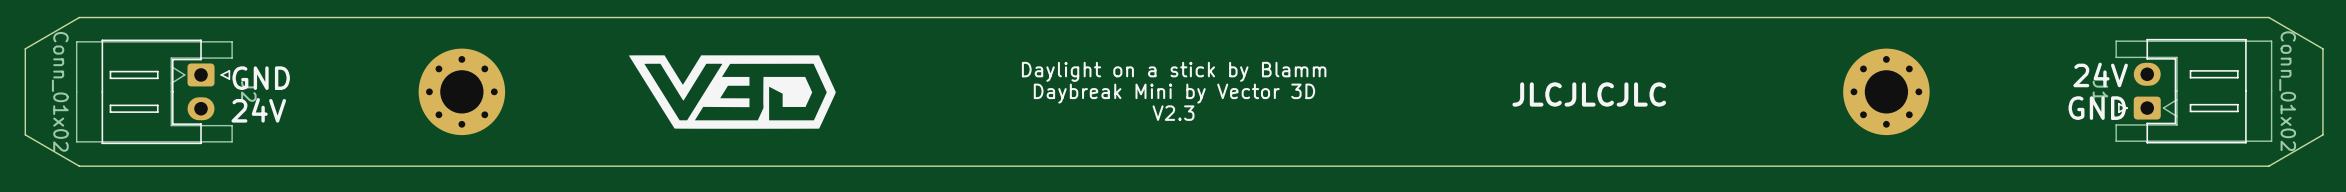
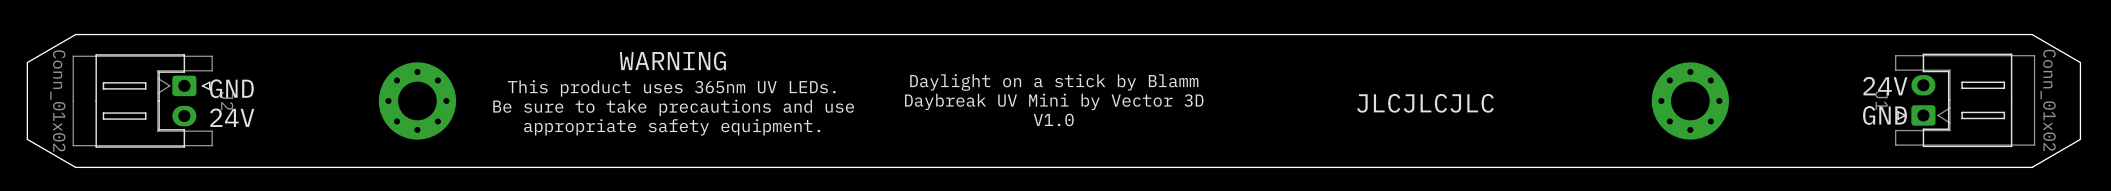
text: none -> WARNING (672, 61)
drawing: [628, 55, 836, 129] -> none
text: none -> This product uses 365nm UV LEDs. (671, 88)
text: Daybreak Mini by Vector 3D (1174, 93) -> Daybreak UV Mini by Vector 3D (1054, 101)
text: none -> Be sure to take precautions and use (673, 107)
text: V2.3 (1173, 113) -> V1.0 (1053, 119)
text: none -> appropriate safety equipment. (672, 127)

